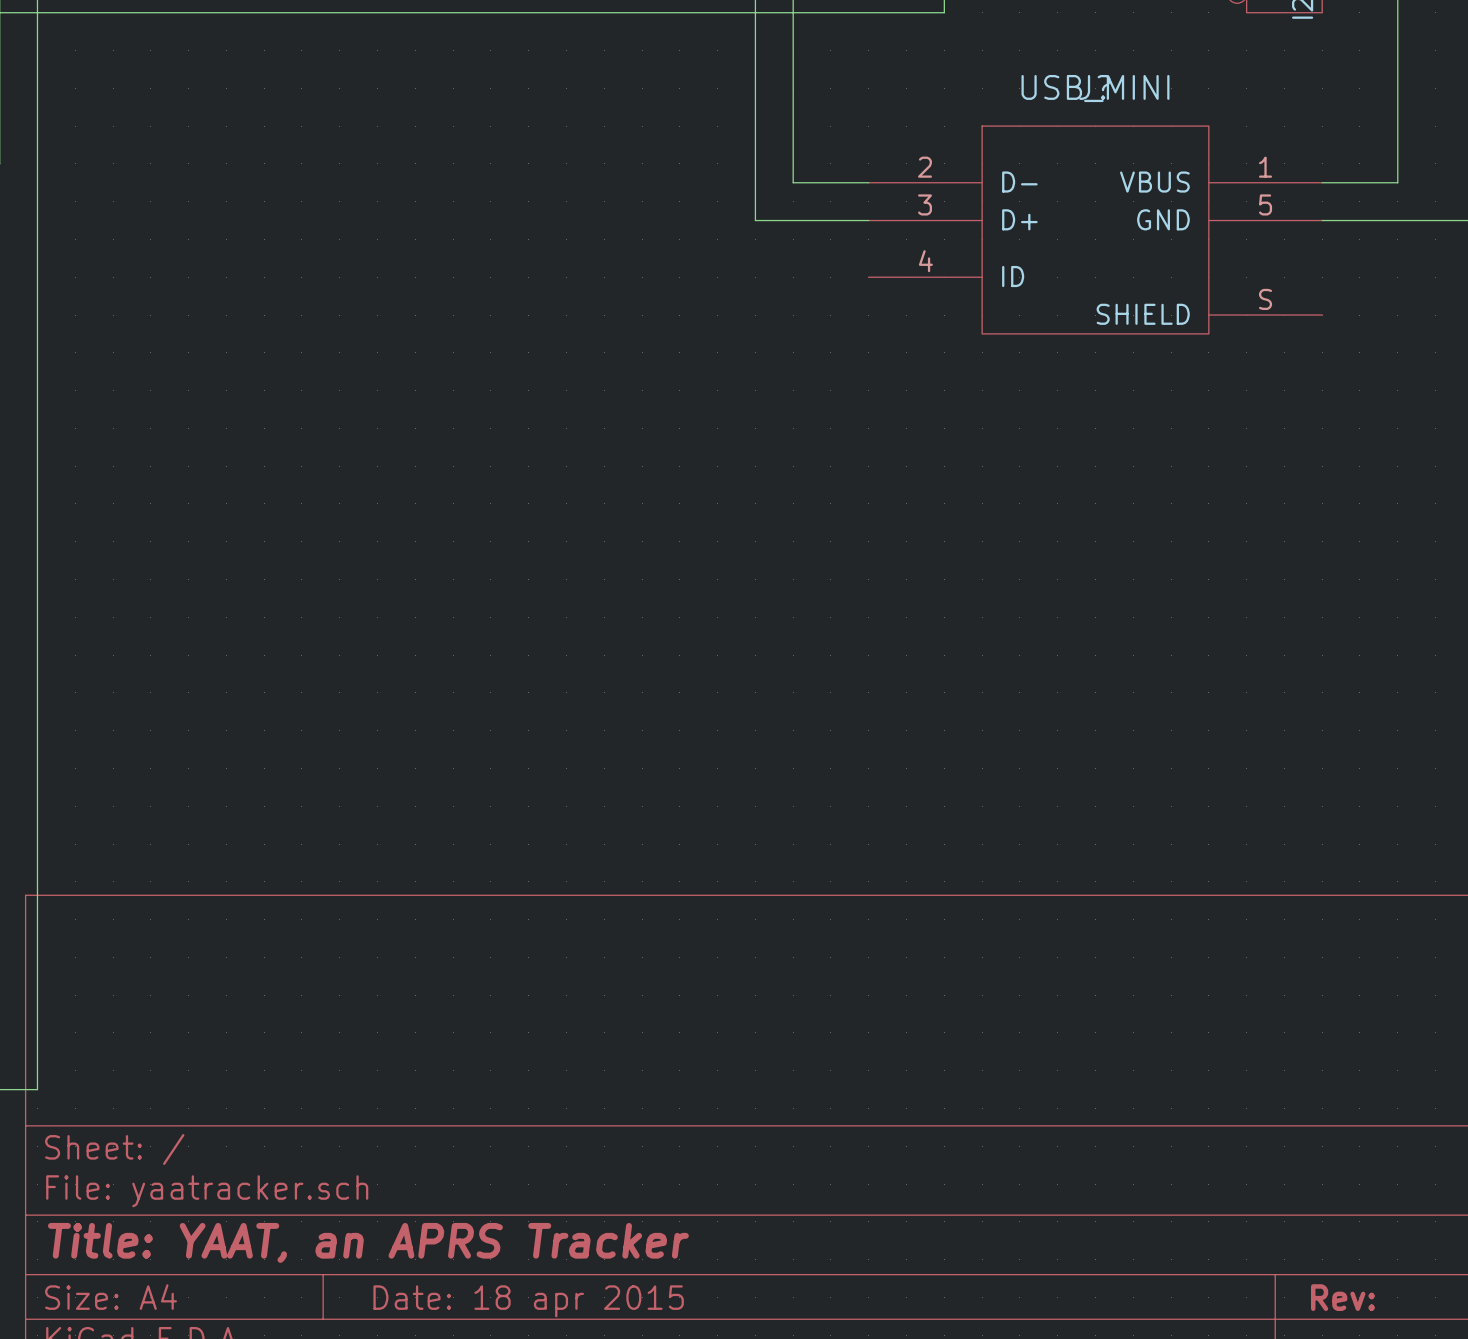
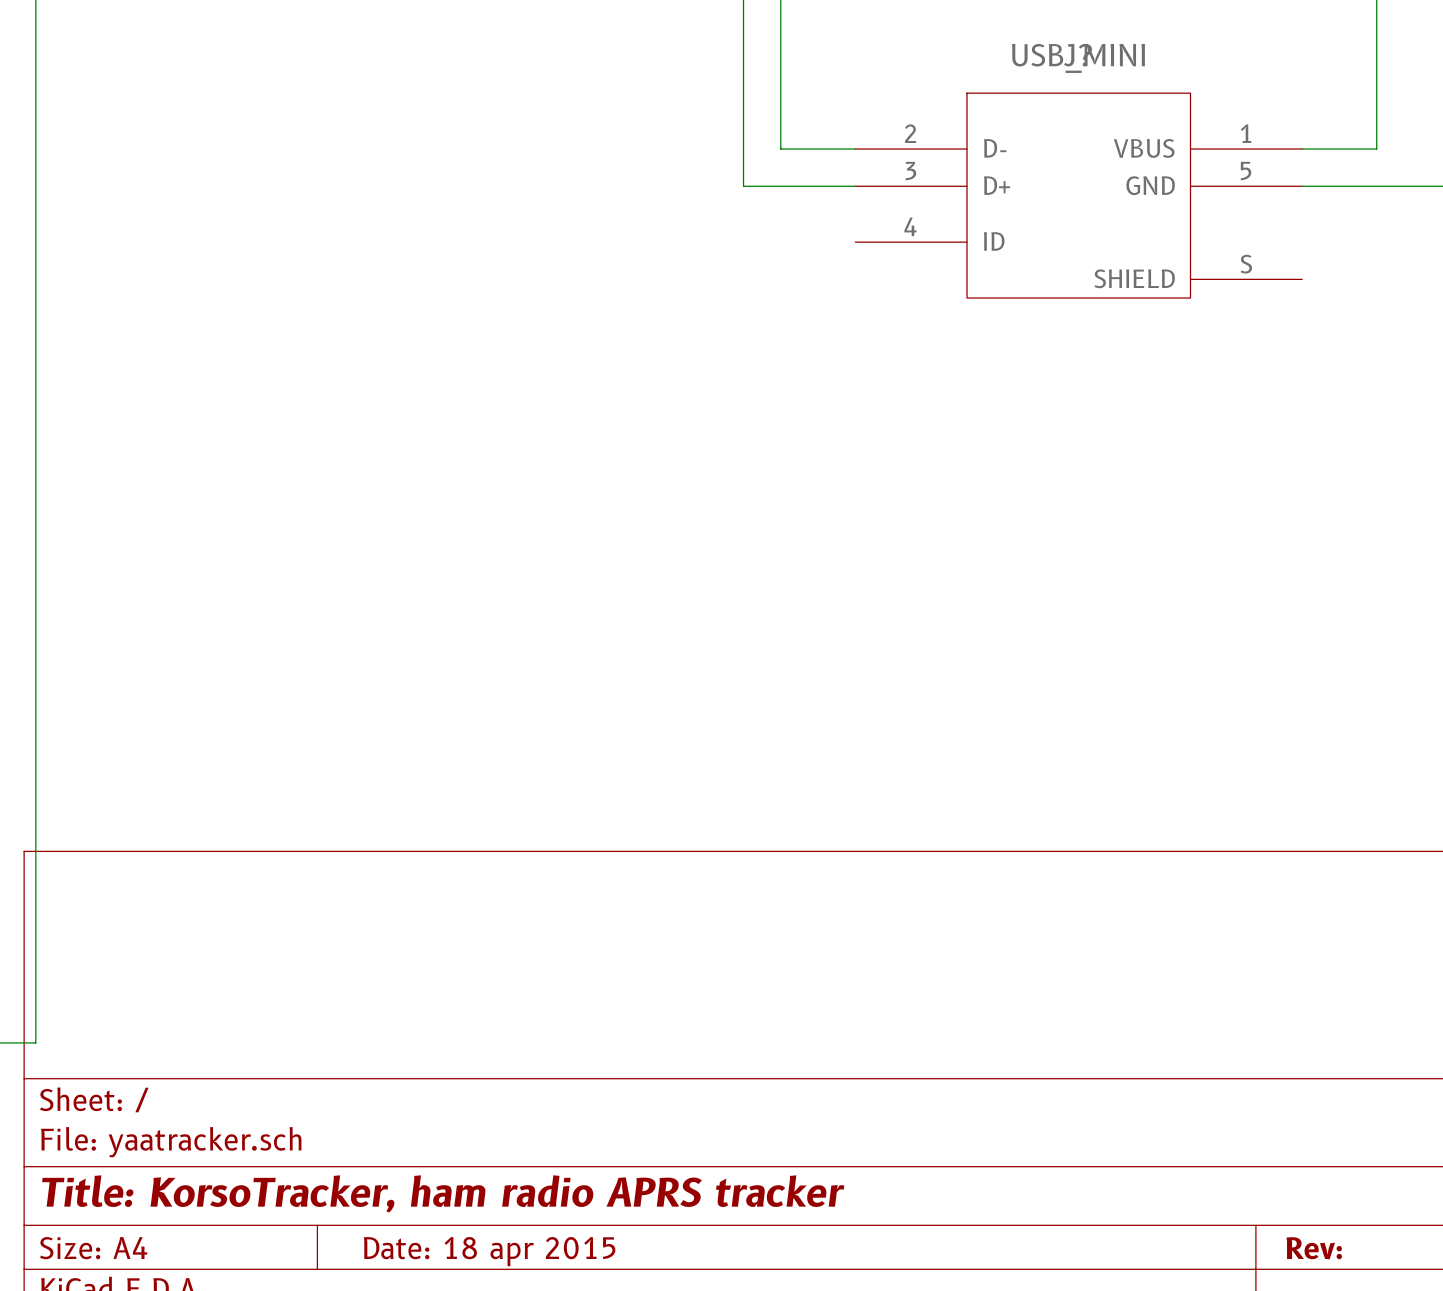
title block: Title: YAAT, an APRS Tracker (368, 1242) -> Title: KorsoTracker, ham radio APRS tracker (443, 1193)

